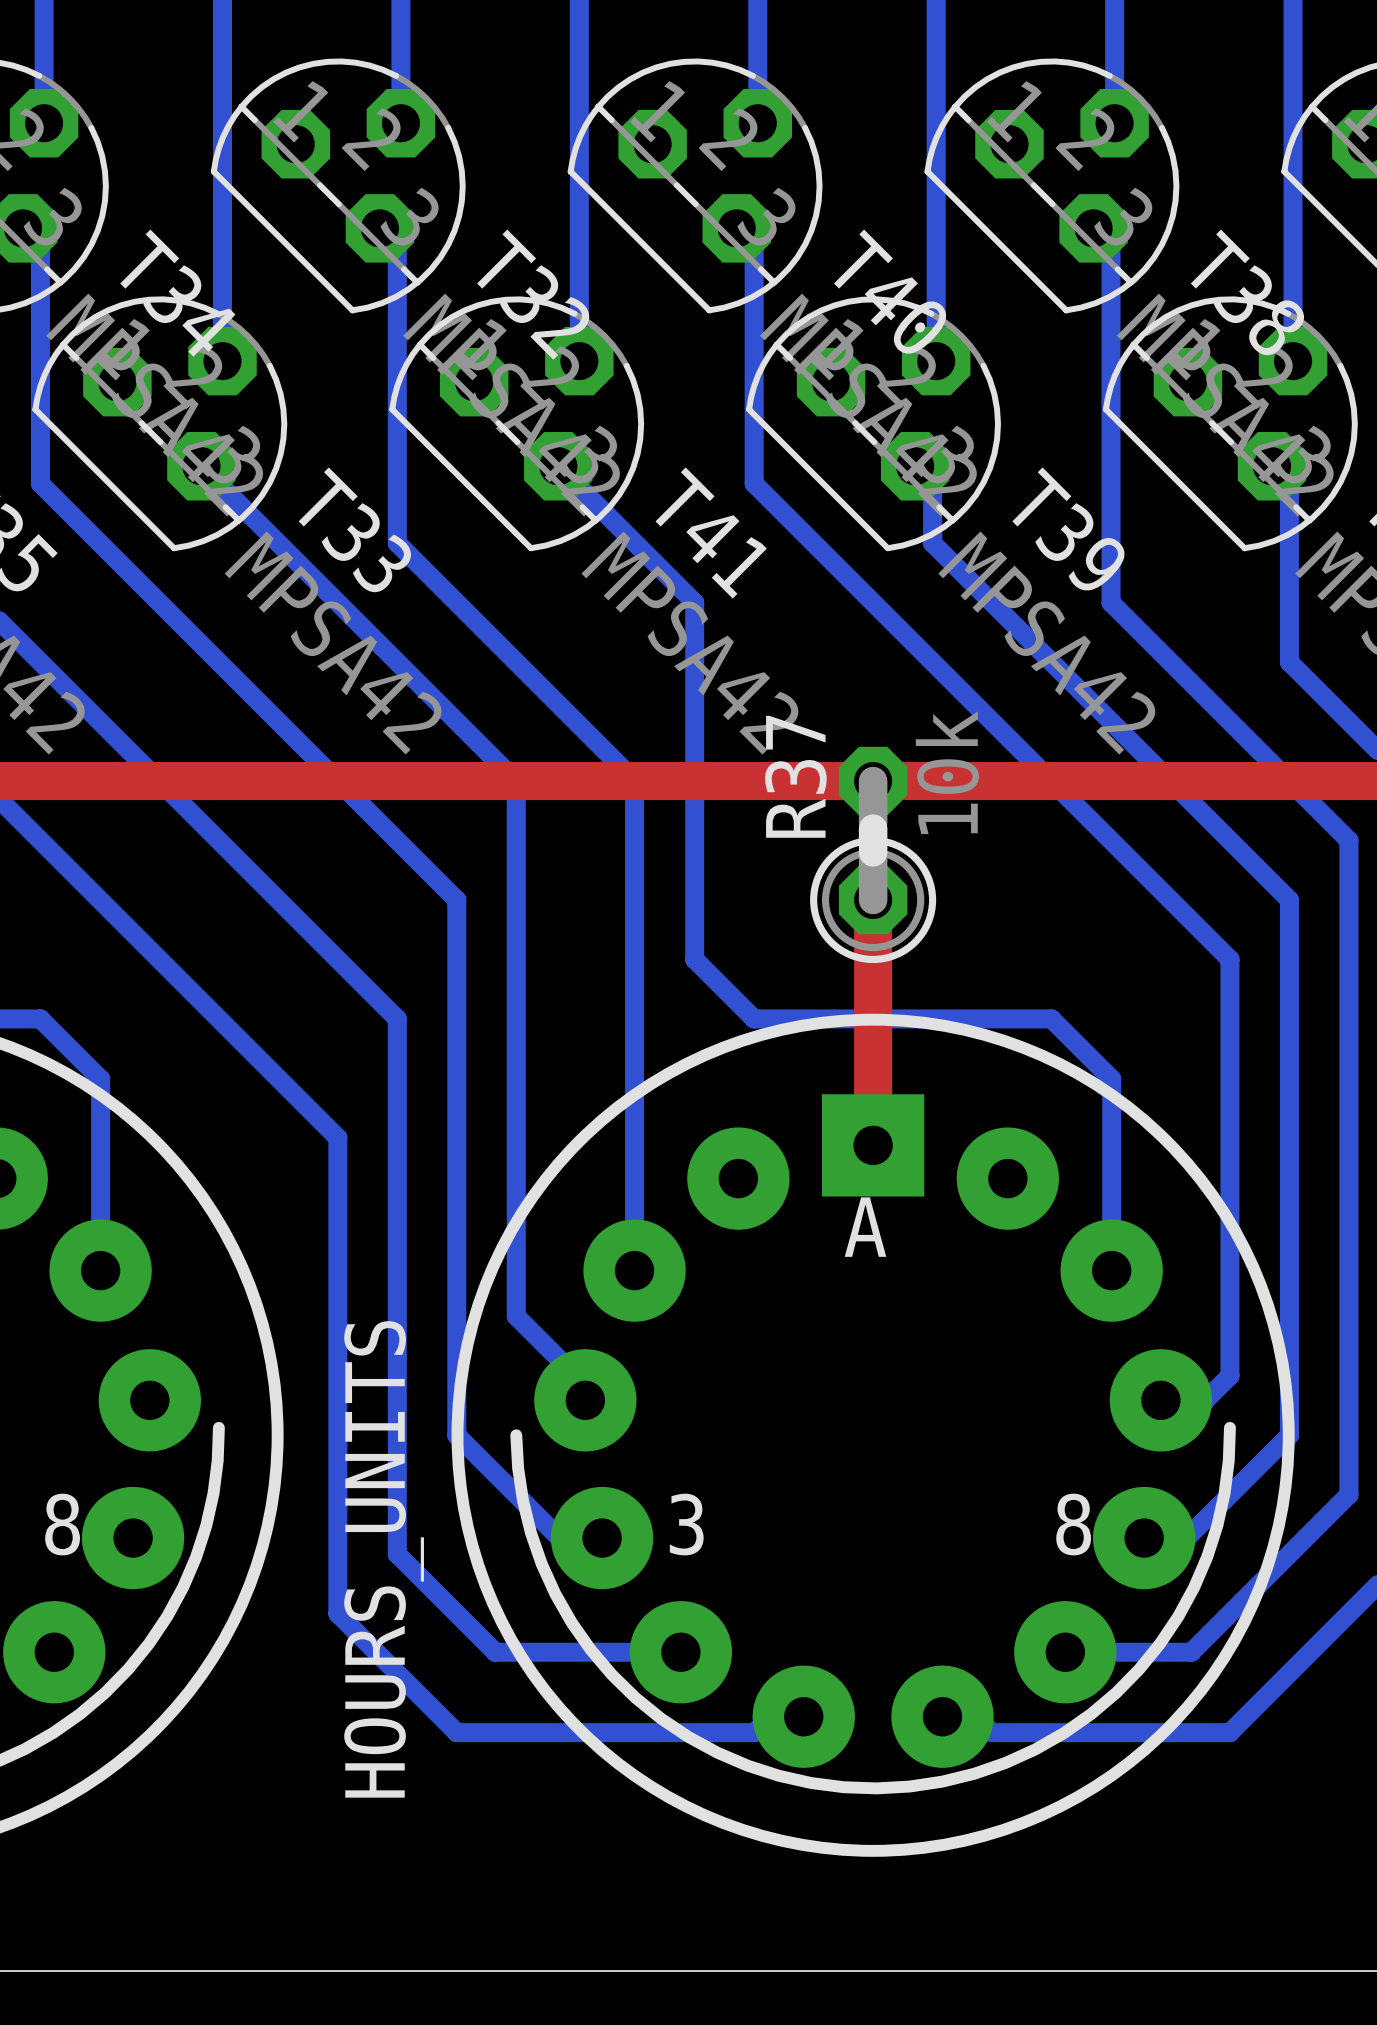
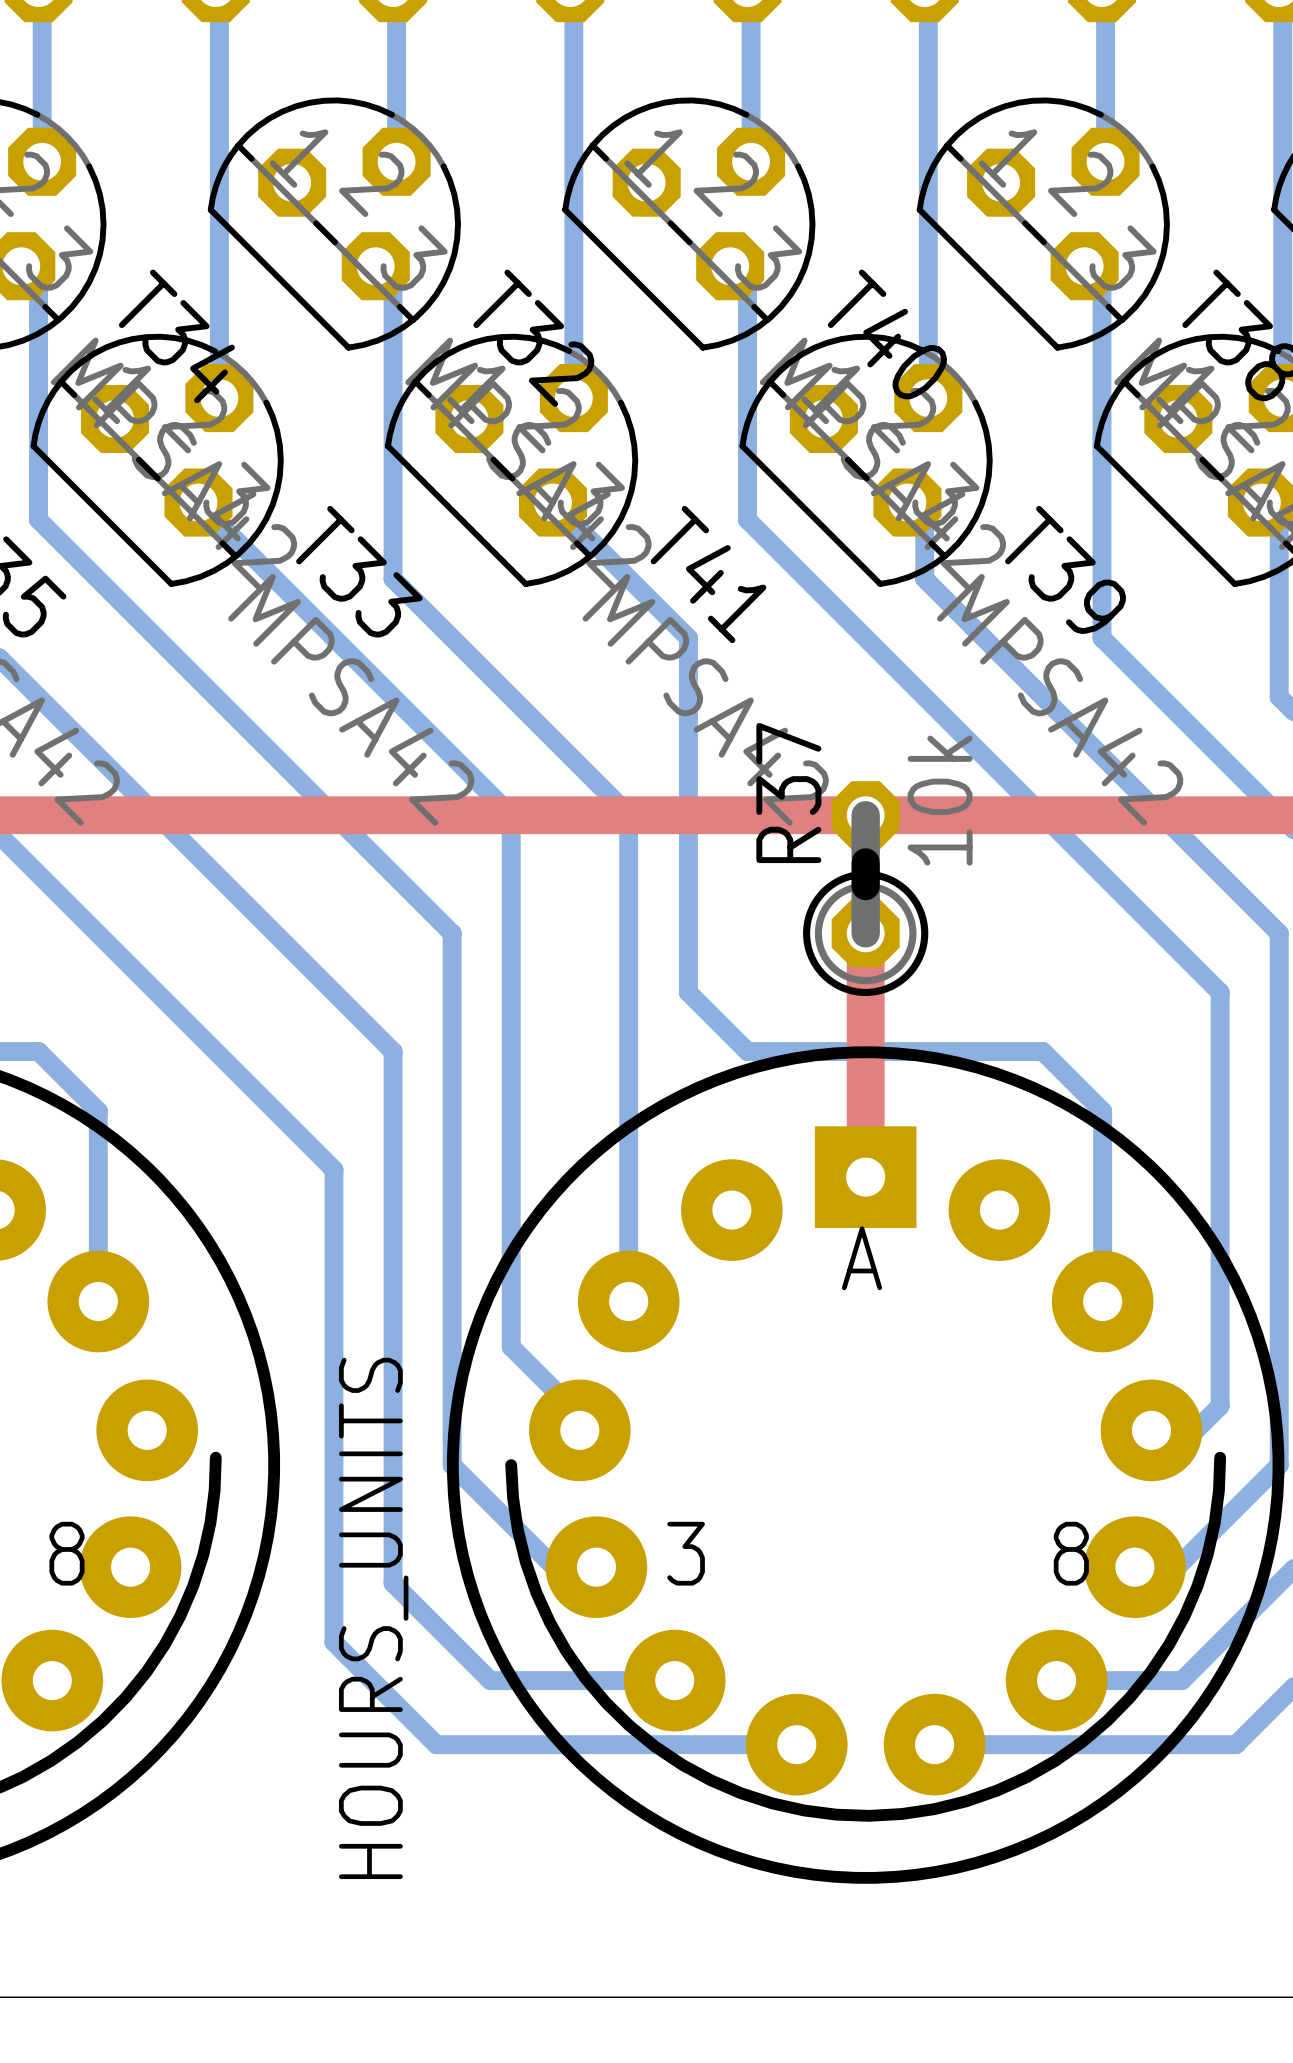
bottom track: (440, 1716) (456, 1732) (754, 1732) (770, 1716) -> (436, 1744) (763, 1744)
bottom track: (976, 1716) (992, 1732) (1229, 1732) (1245, 1716) -> (968, 1744) (1235, 1744)

